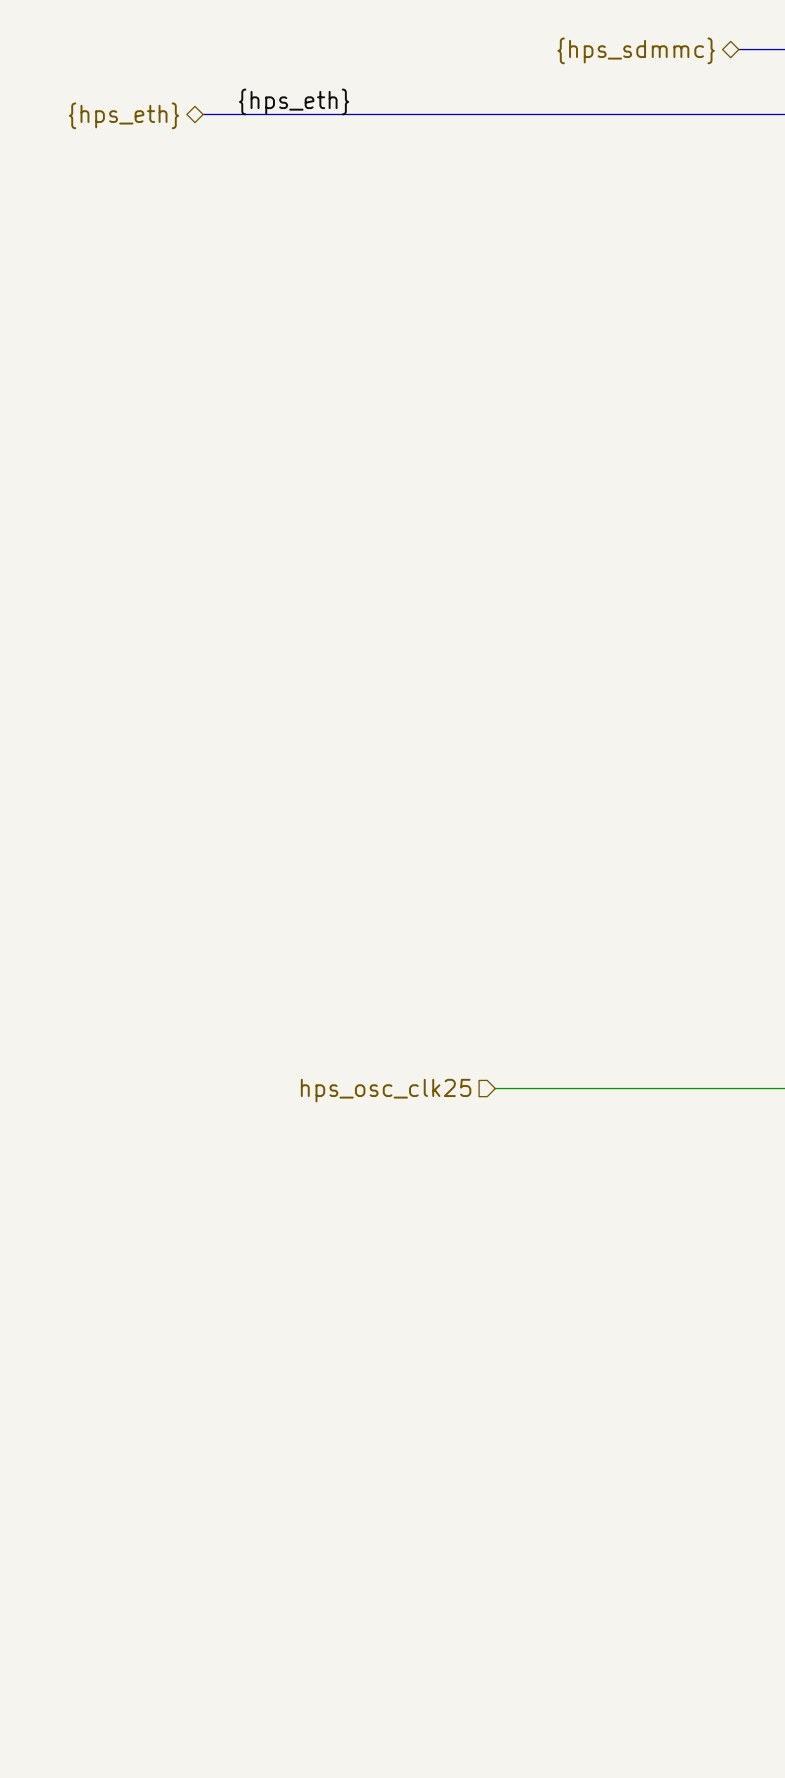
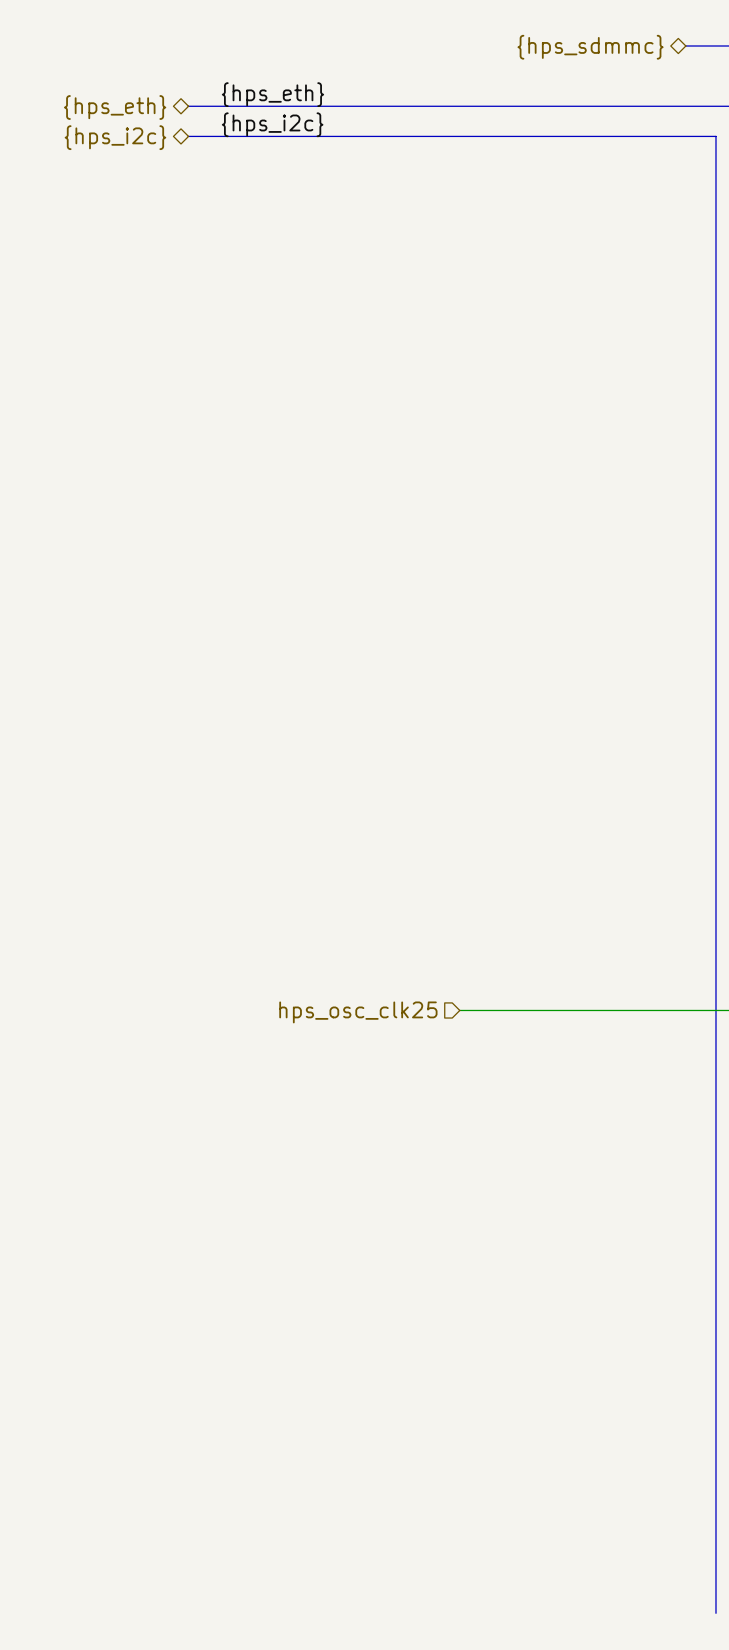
label: none -> {hps_i2c} (272, 124)
bus: none -> (188, 136) (715, 136) (715, 1613)
hierarchical label: none -> {hps_i2c} (115, 137)

